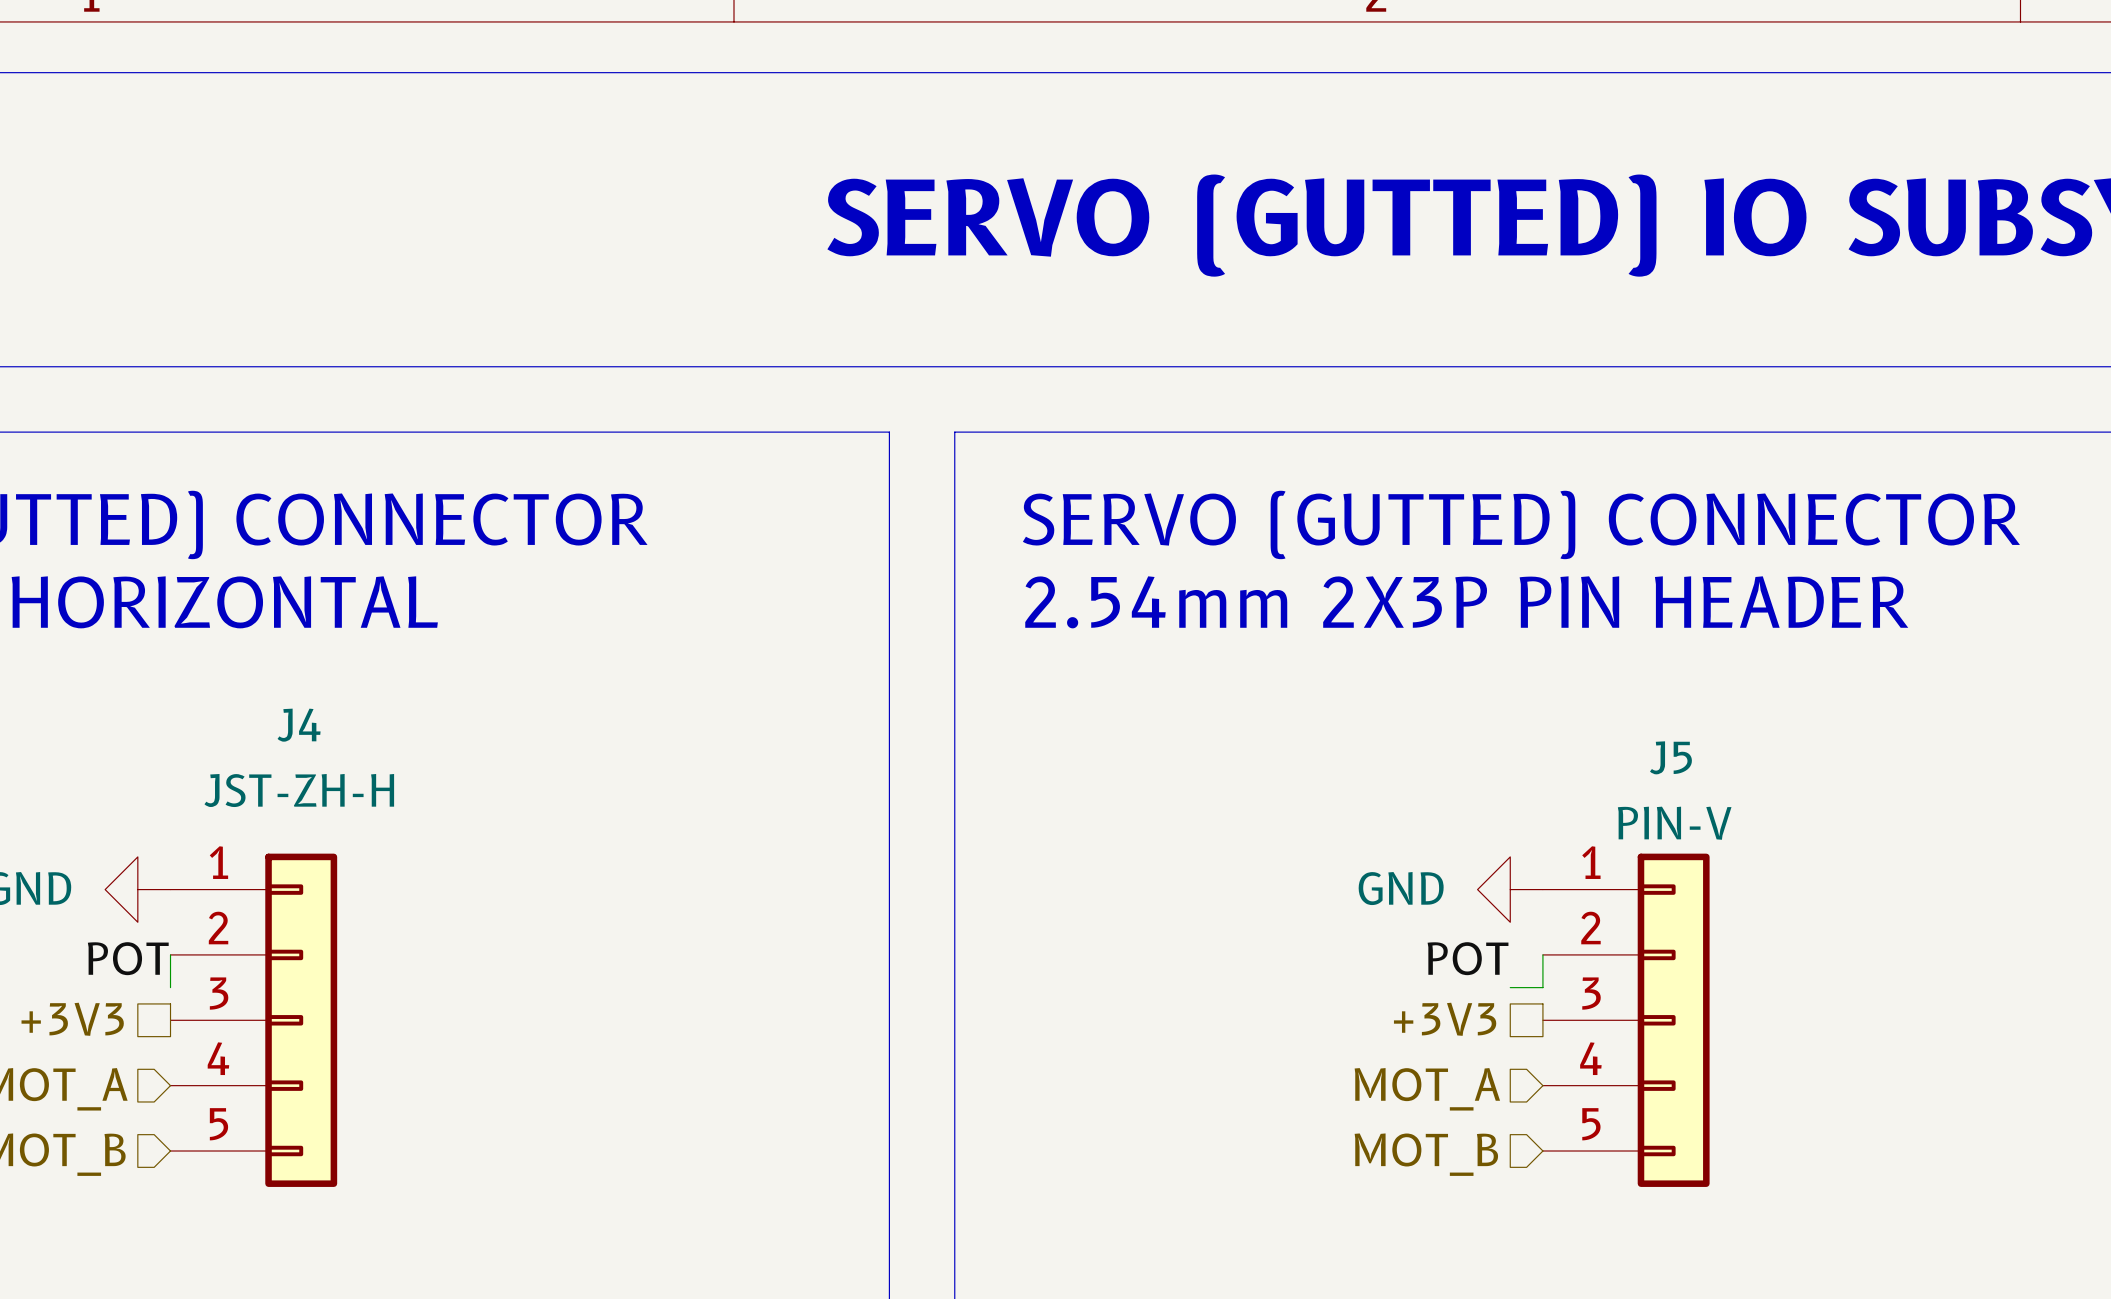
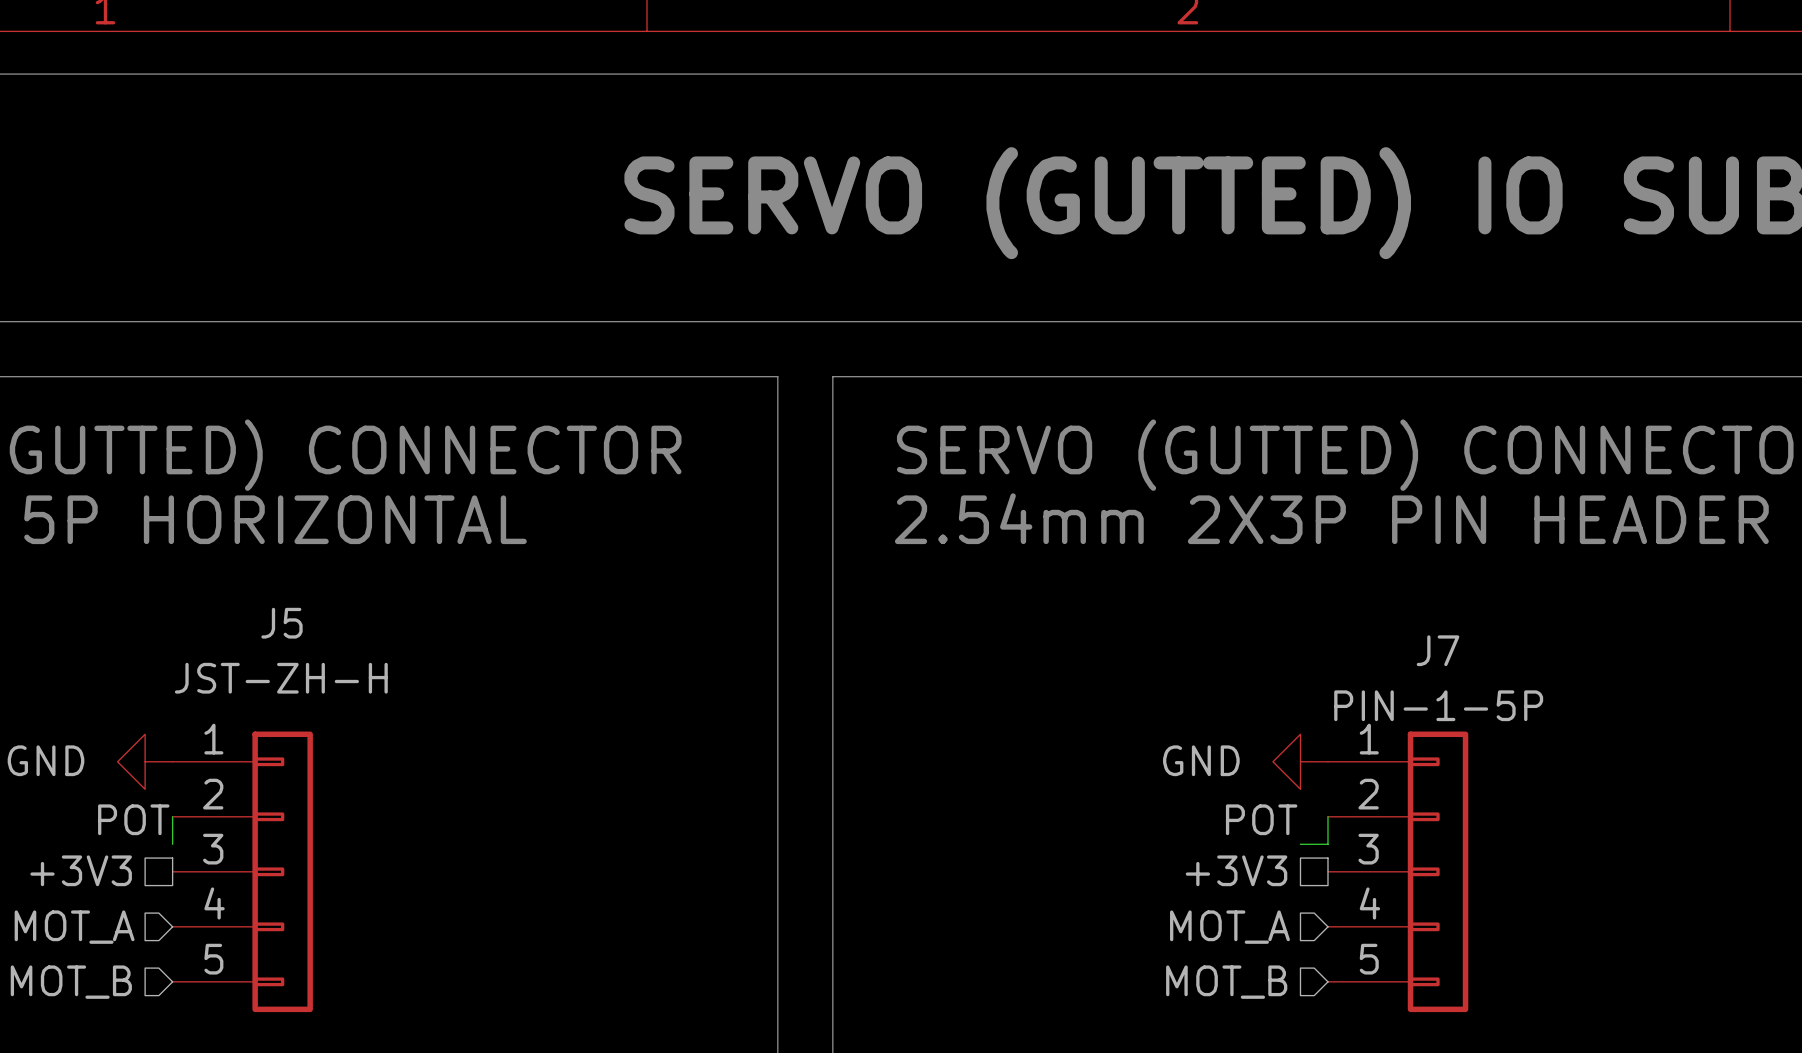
J4 name: J4 (299, 725) -> J5 (282, 623)
J5 name: J5 (1670, 757) -> J7 (1438, 650)
J5 value: PIN-V (1674, 823) -> PIN-1-5P (1438, 705)

